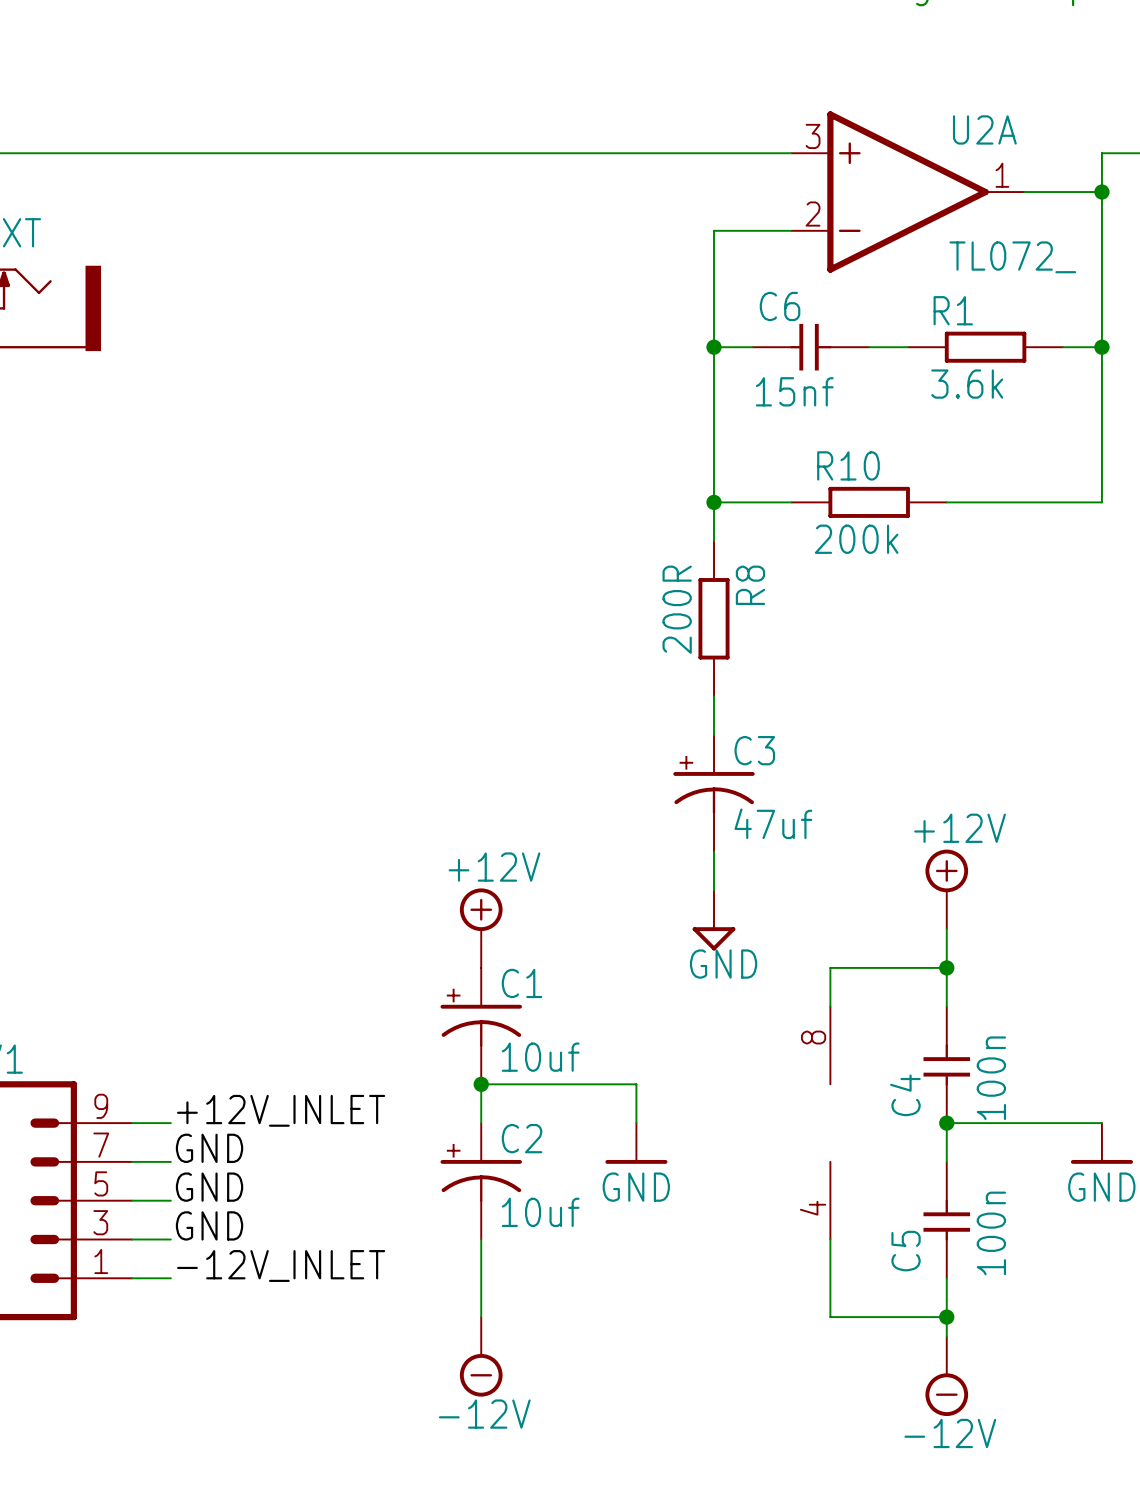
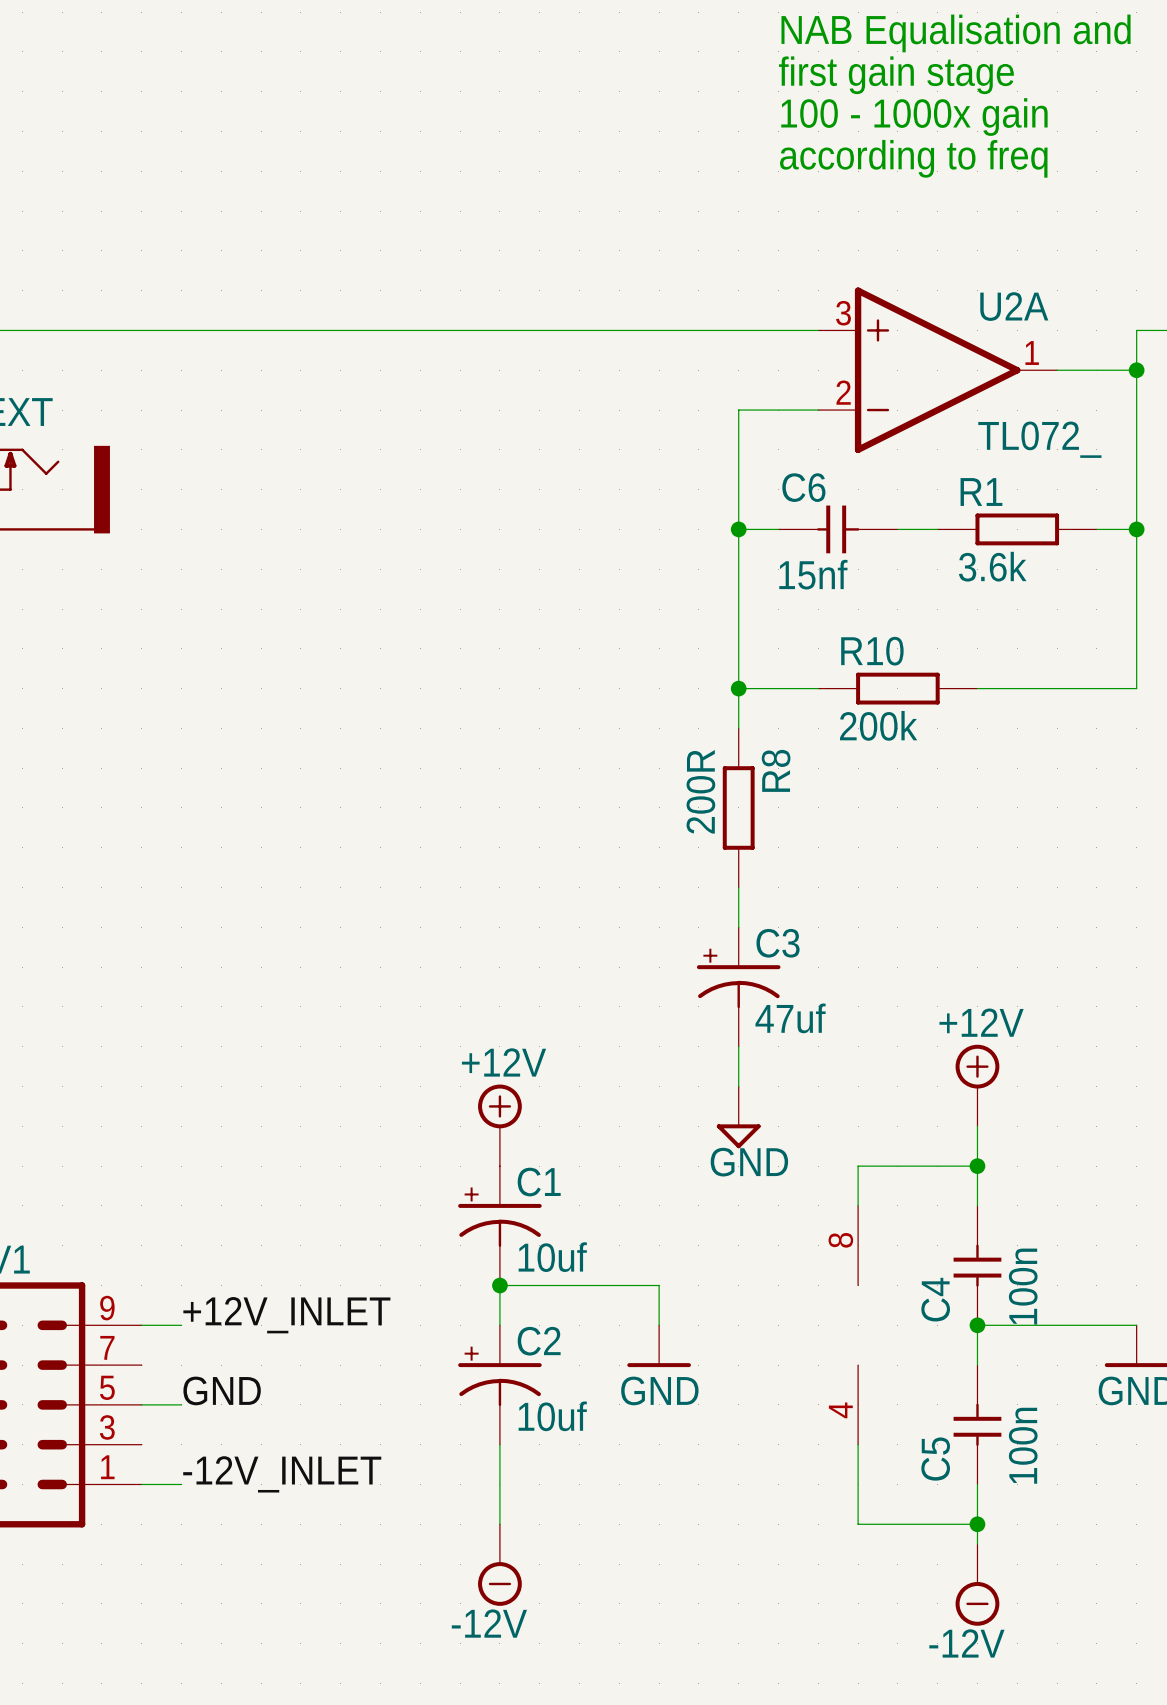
label: GND (209, 1148) -> none
wire: (132, 1161) (170, 1161) -> none
label: GND (209, 1225) -> none
wire: (132, 1239) (170, 1239) -> none

